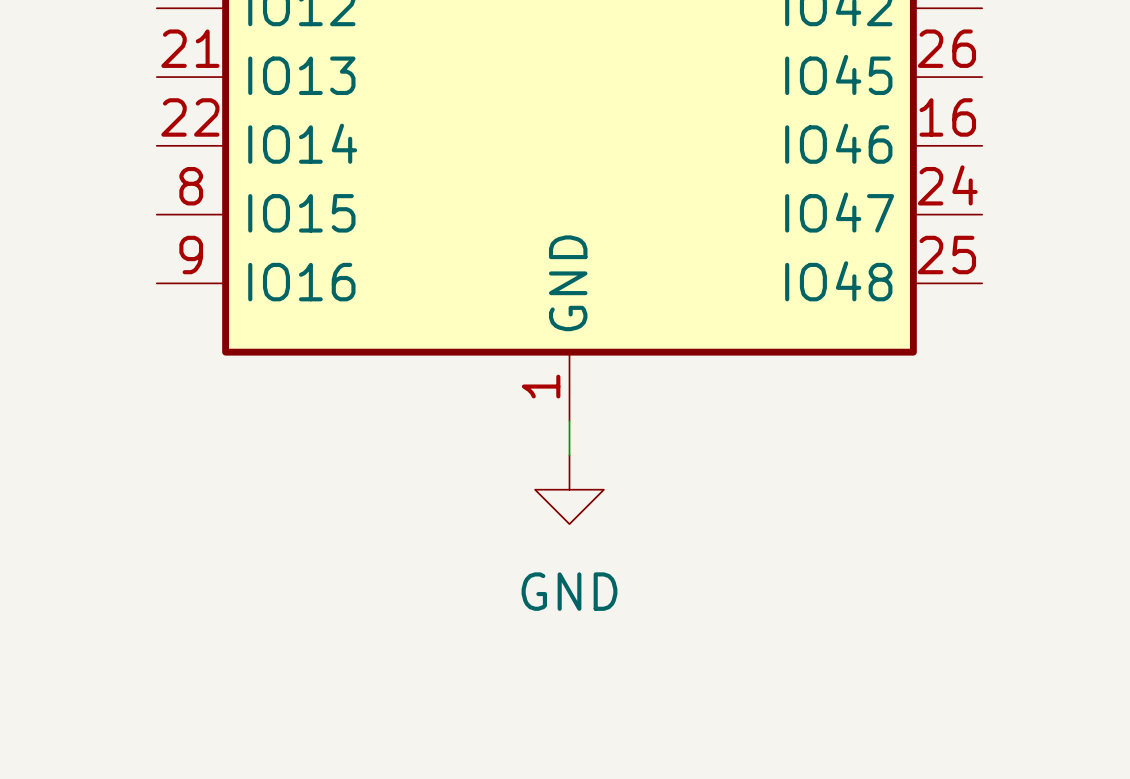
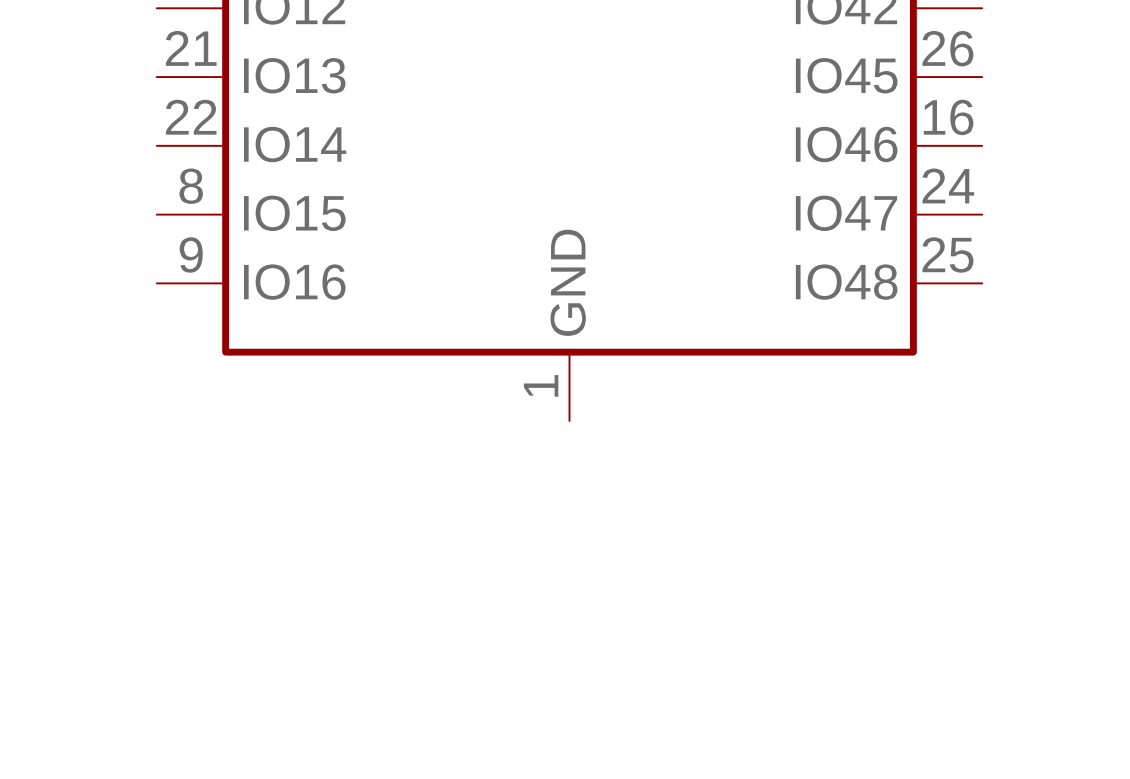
wire: (569, 420) (569, 455) -> none
power symbol: GND (569, 489) -> none

